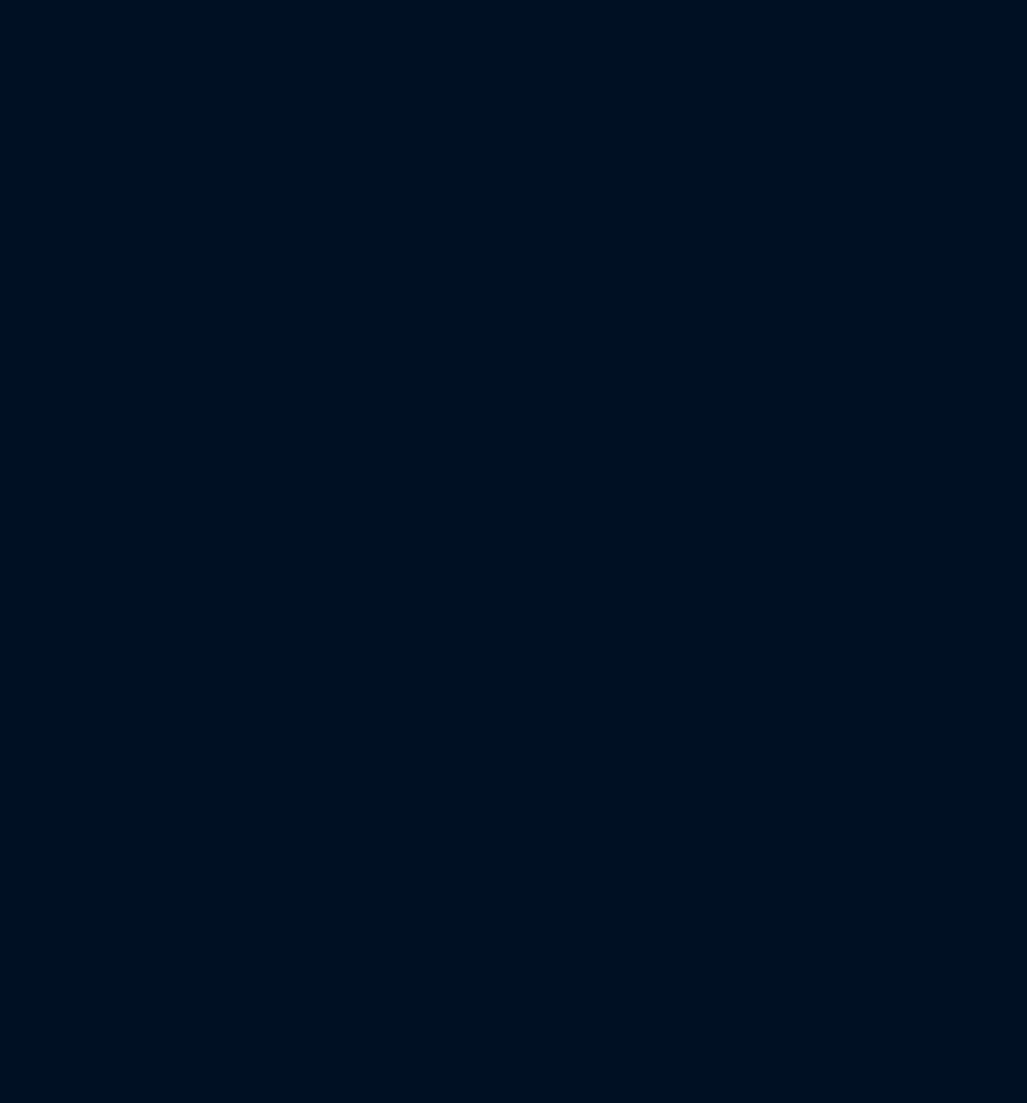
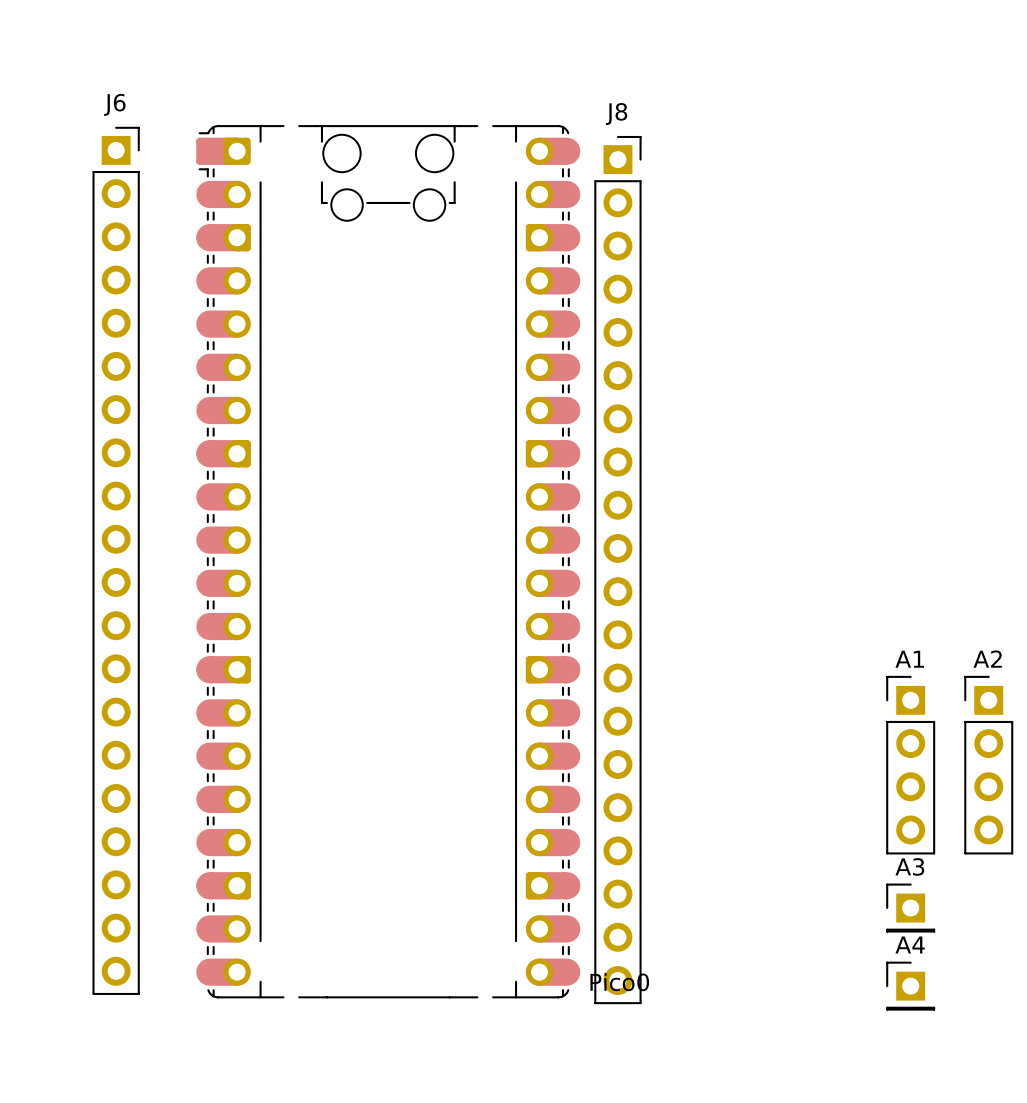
J6: none -> (116, 560)
Pico0: none -> (388, 561)
J8: none -> (617, 570)
A1: none -> (910, 765)
A2: none -> (988, 765)
A3: none -> (910, 908)
A4: none -> (910, 986)

